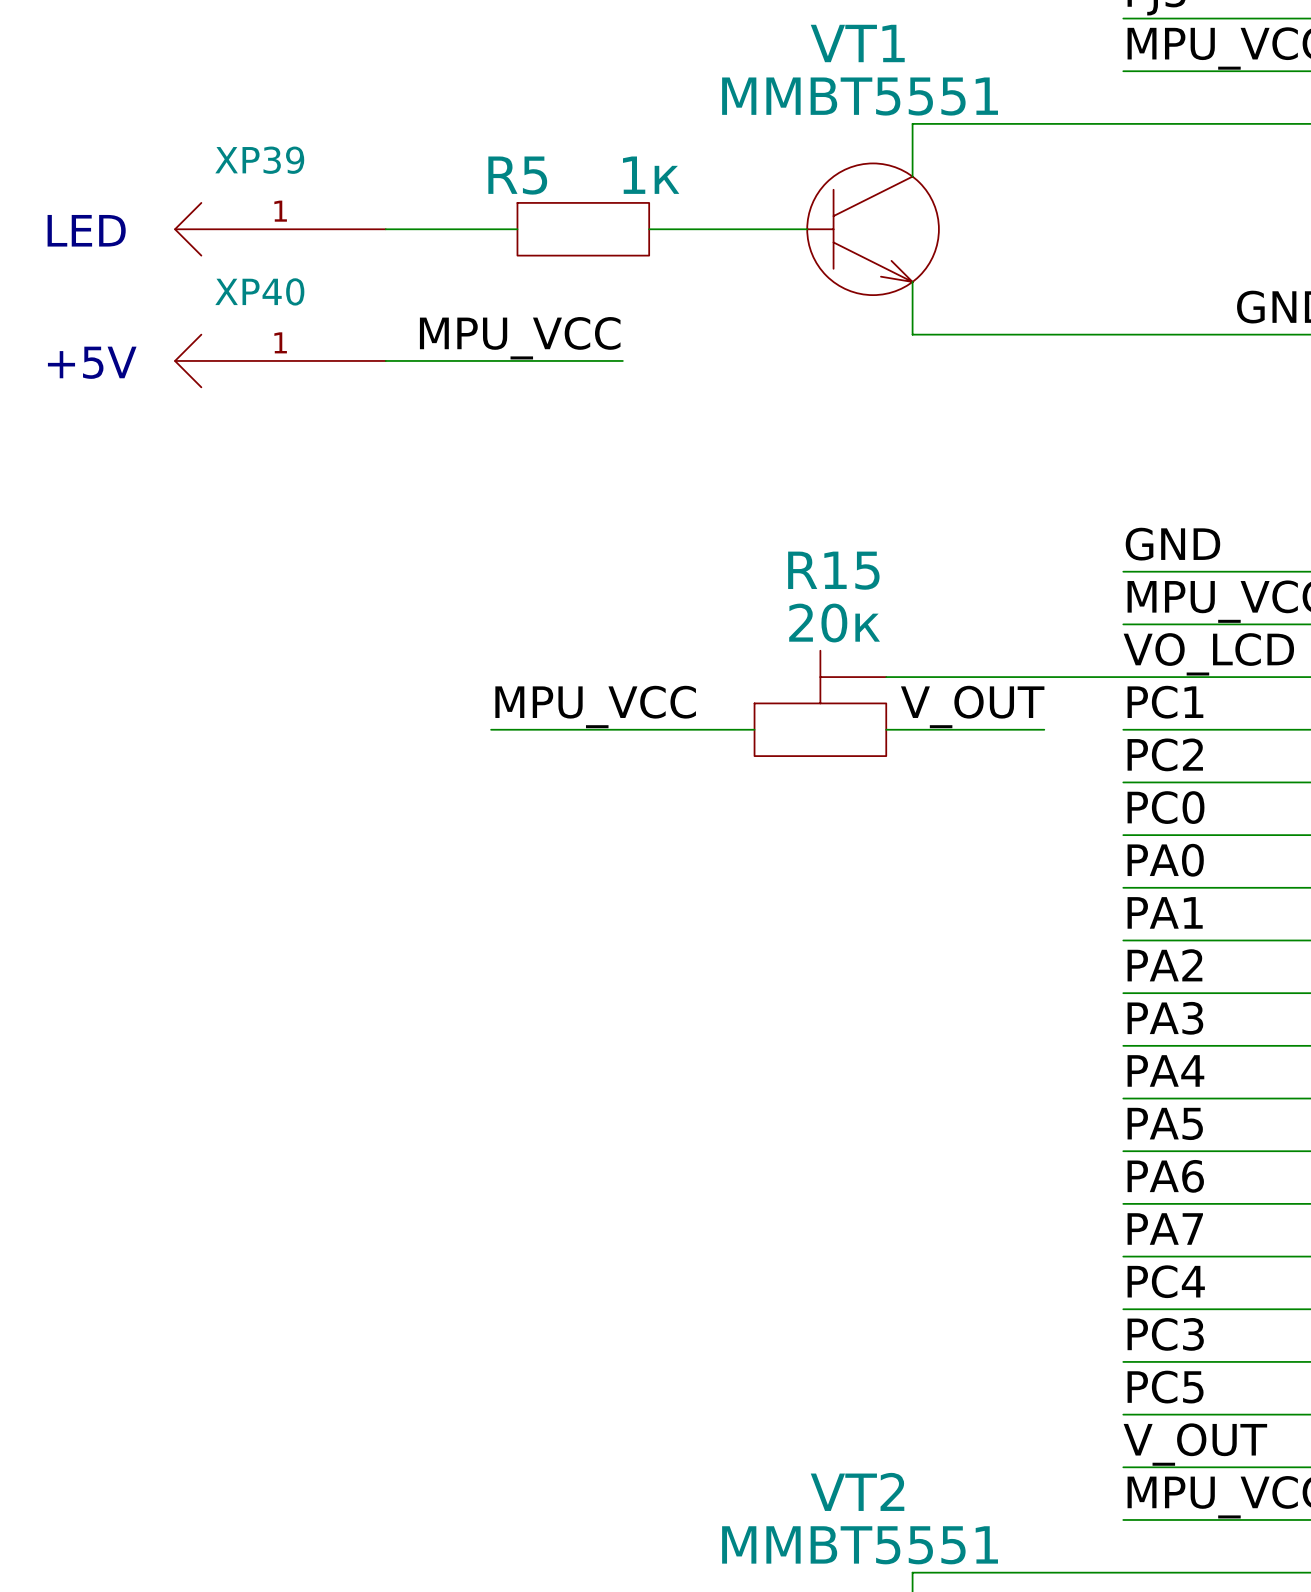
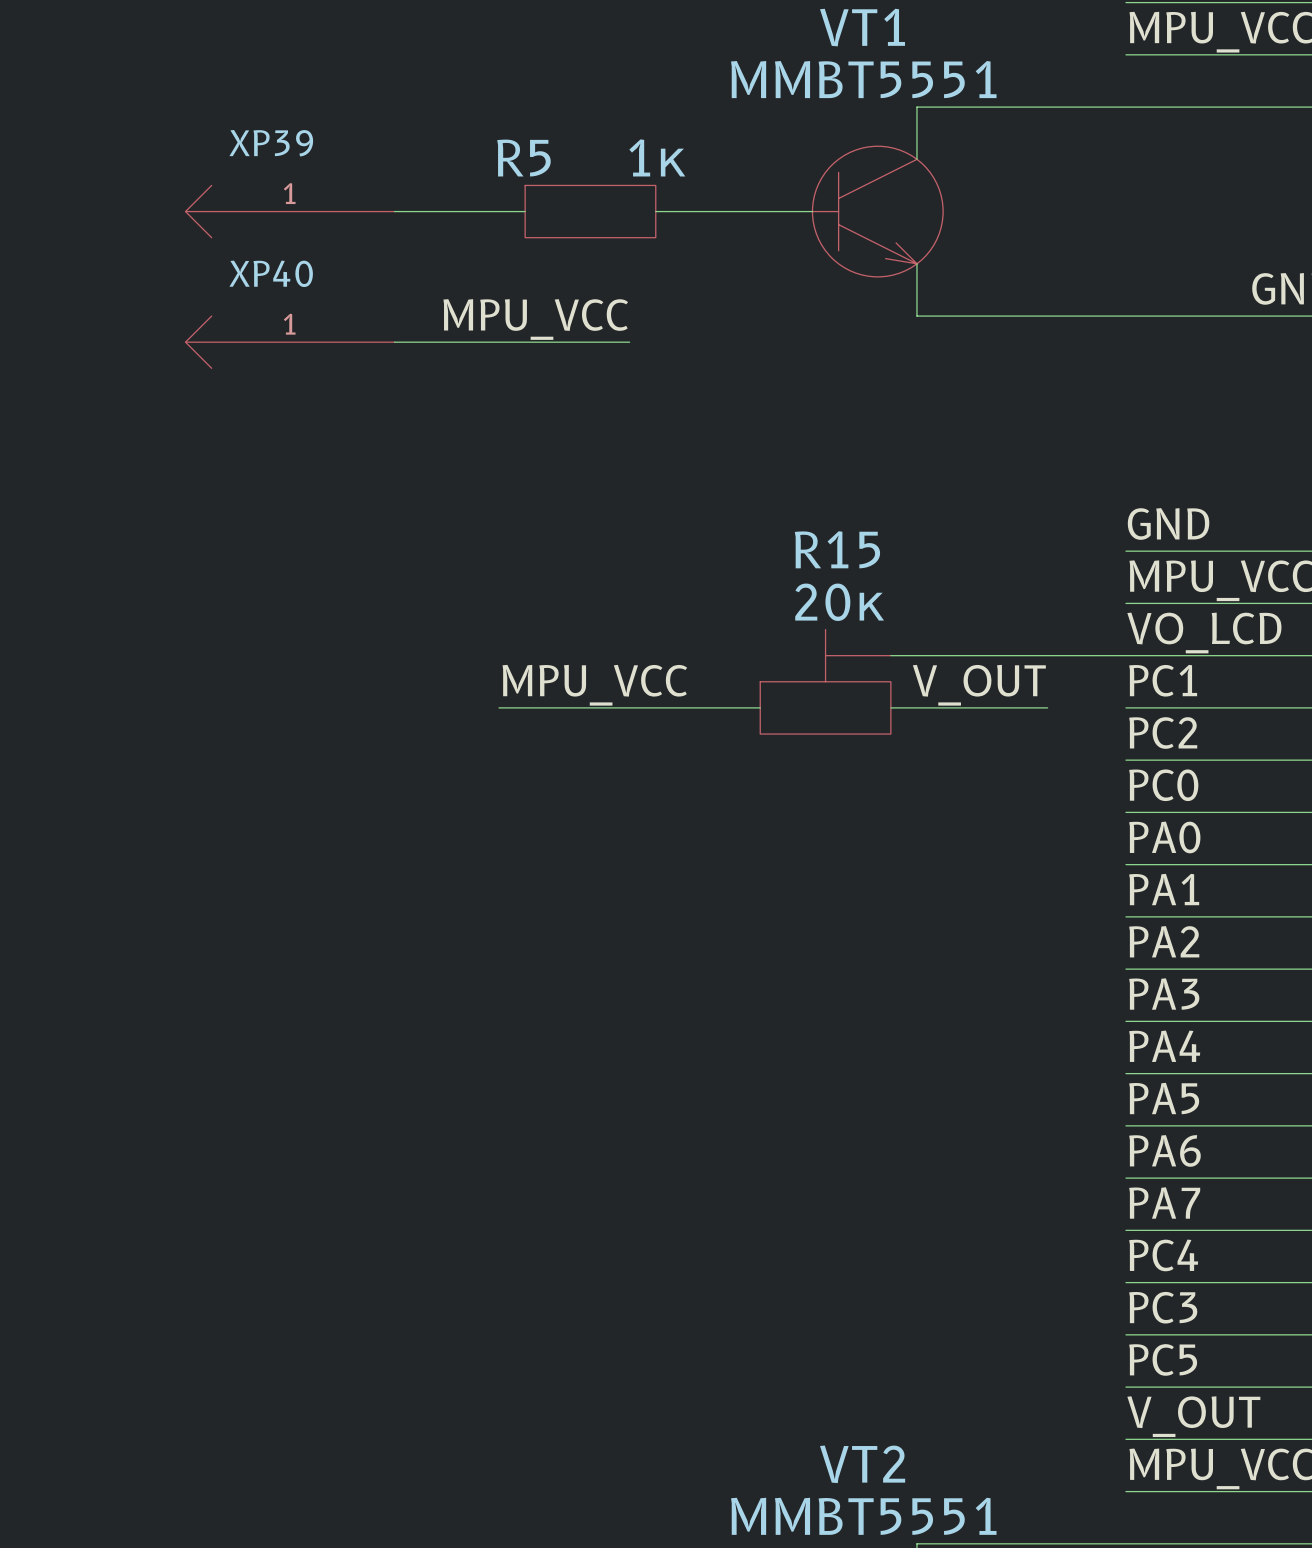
text: LED (86, 230) -> none
text: +5V (92, 362) -> none

